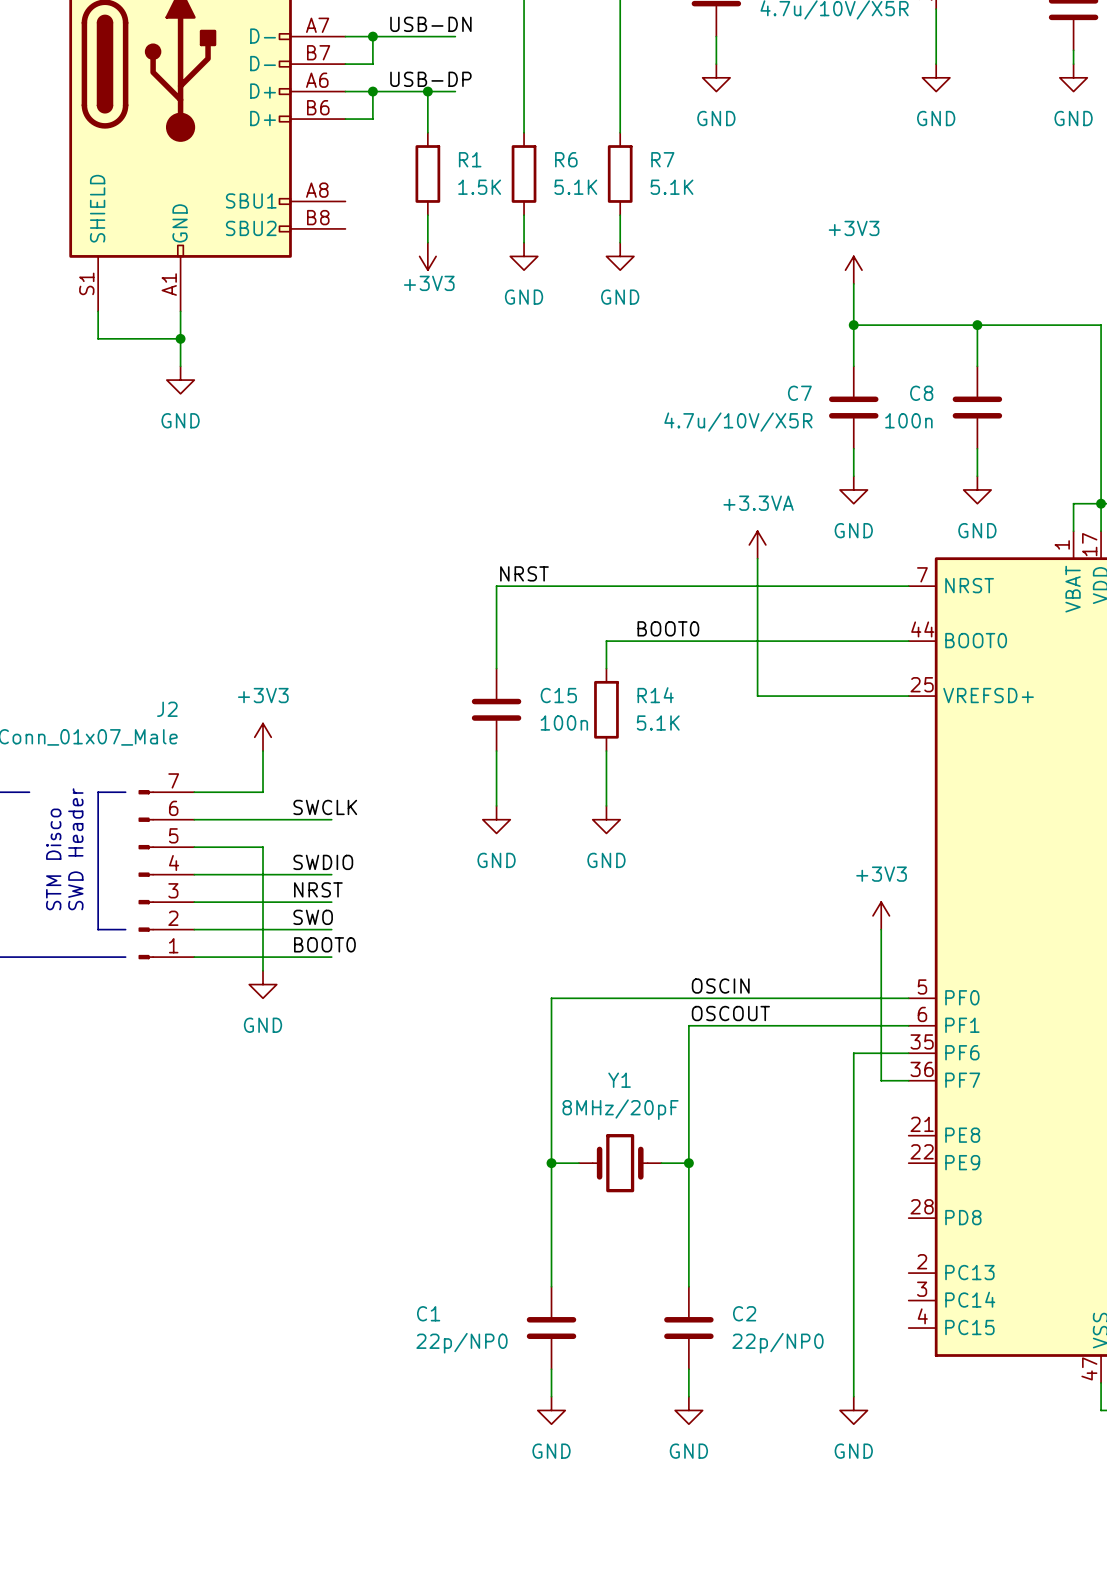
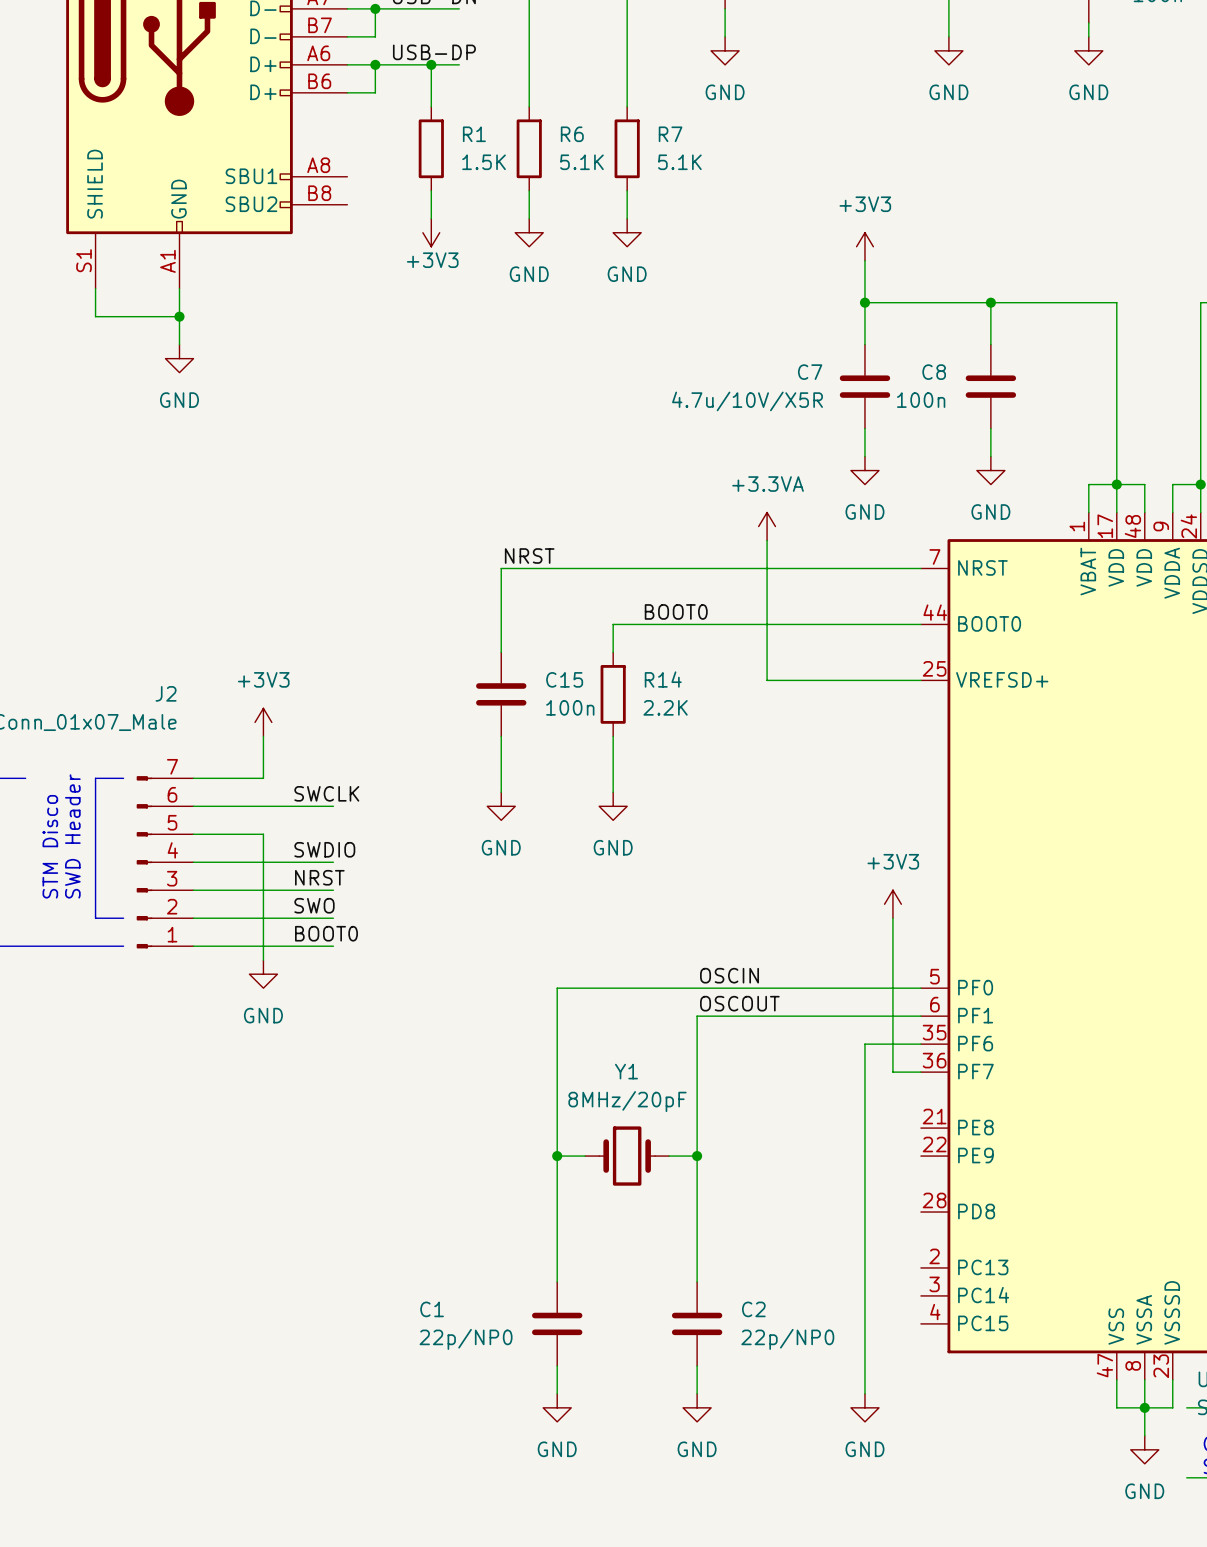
R14 value: 5.1K (658, 723) -> 2.2K (665, 707)

